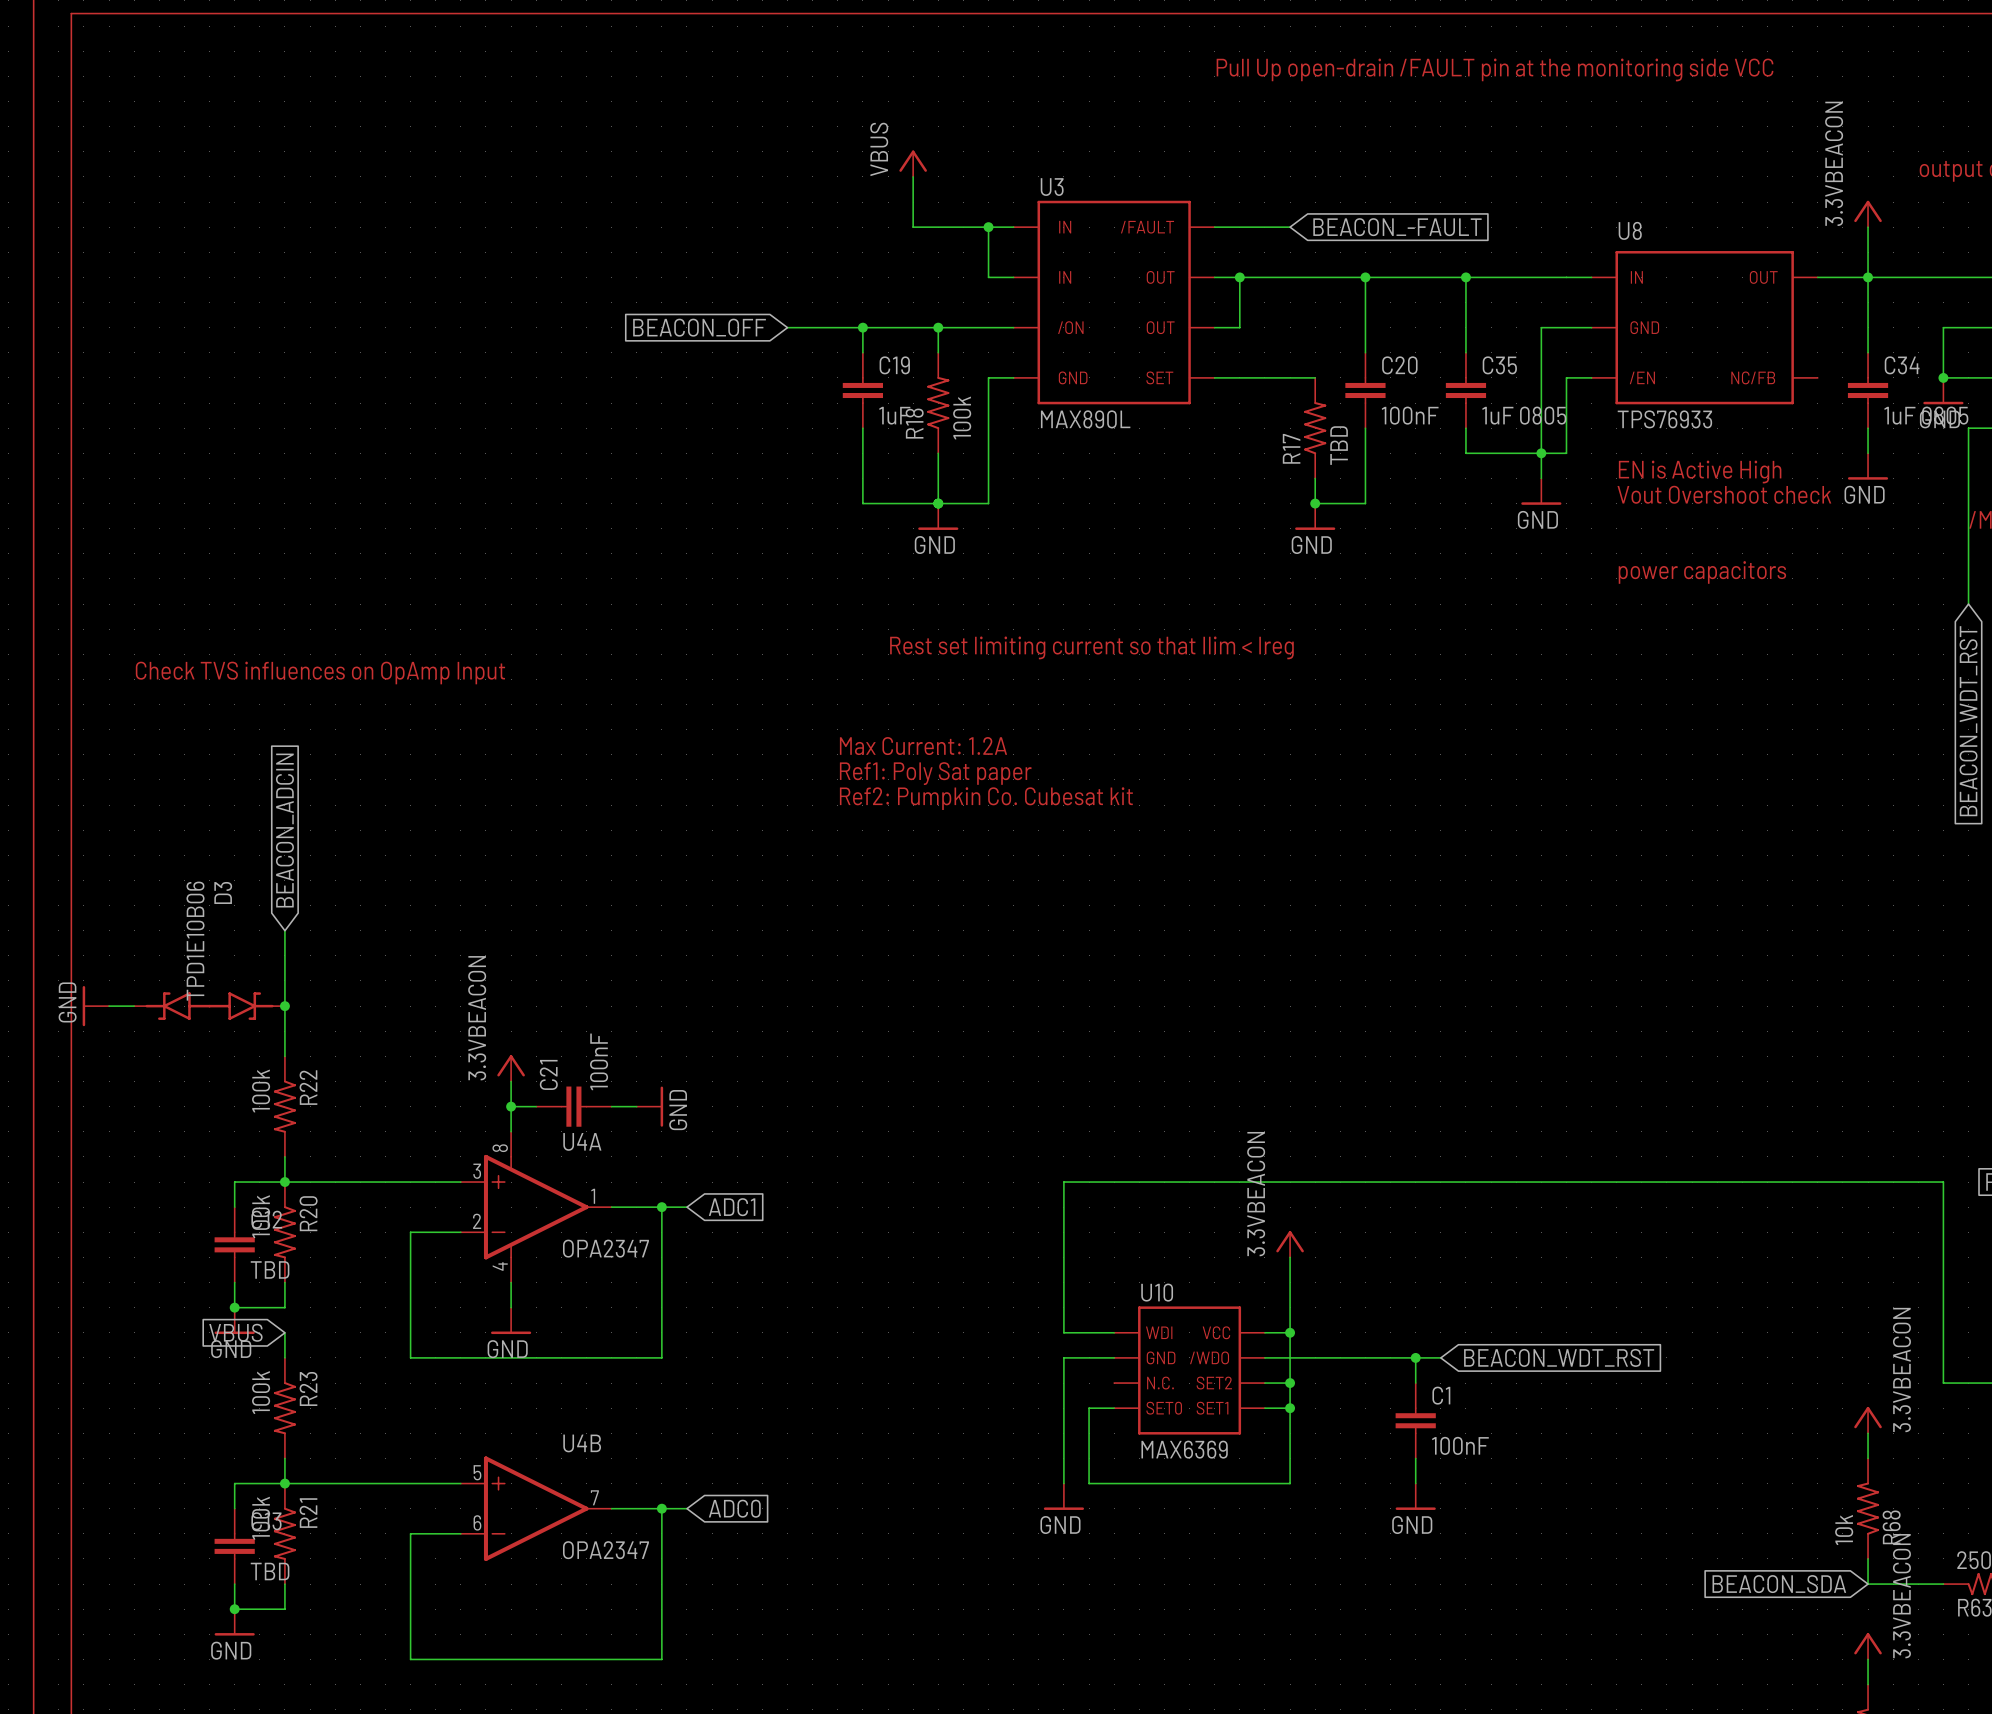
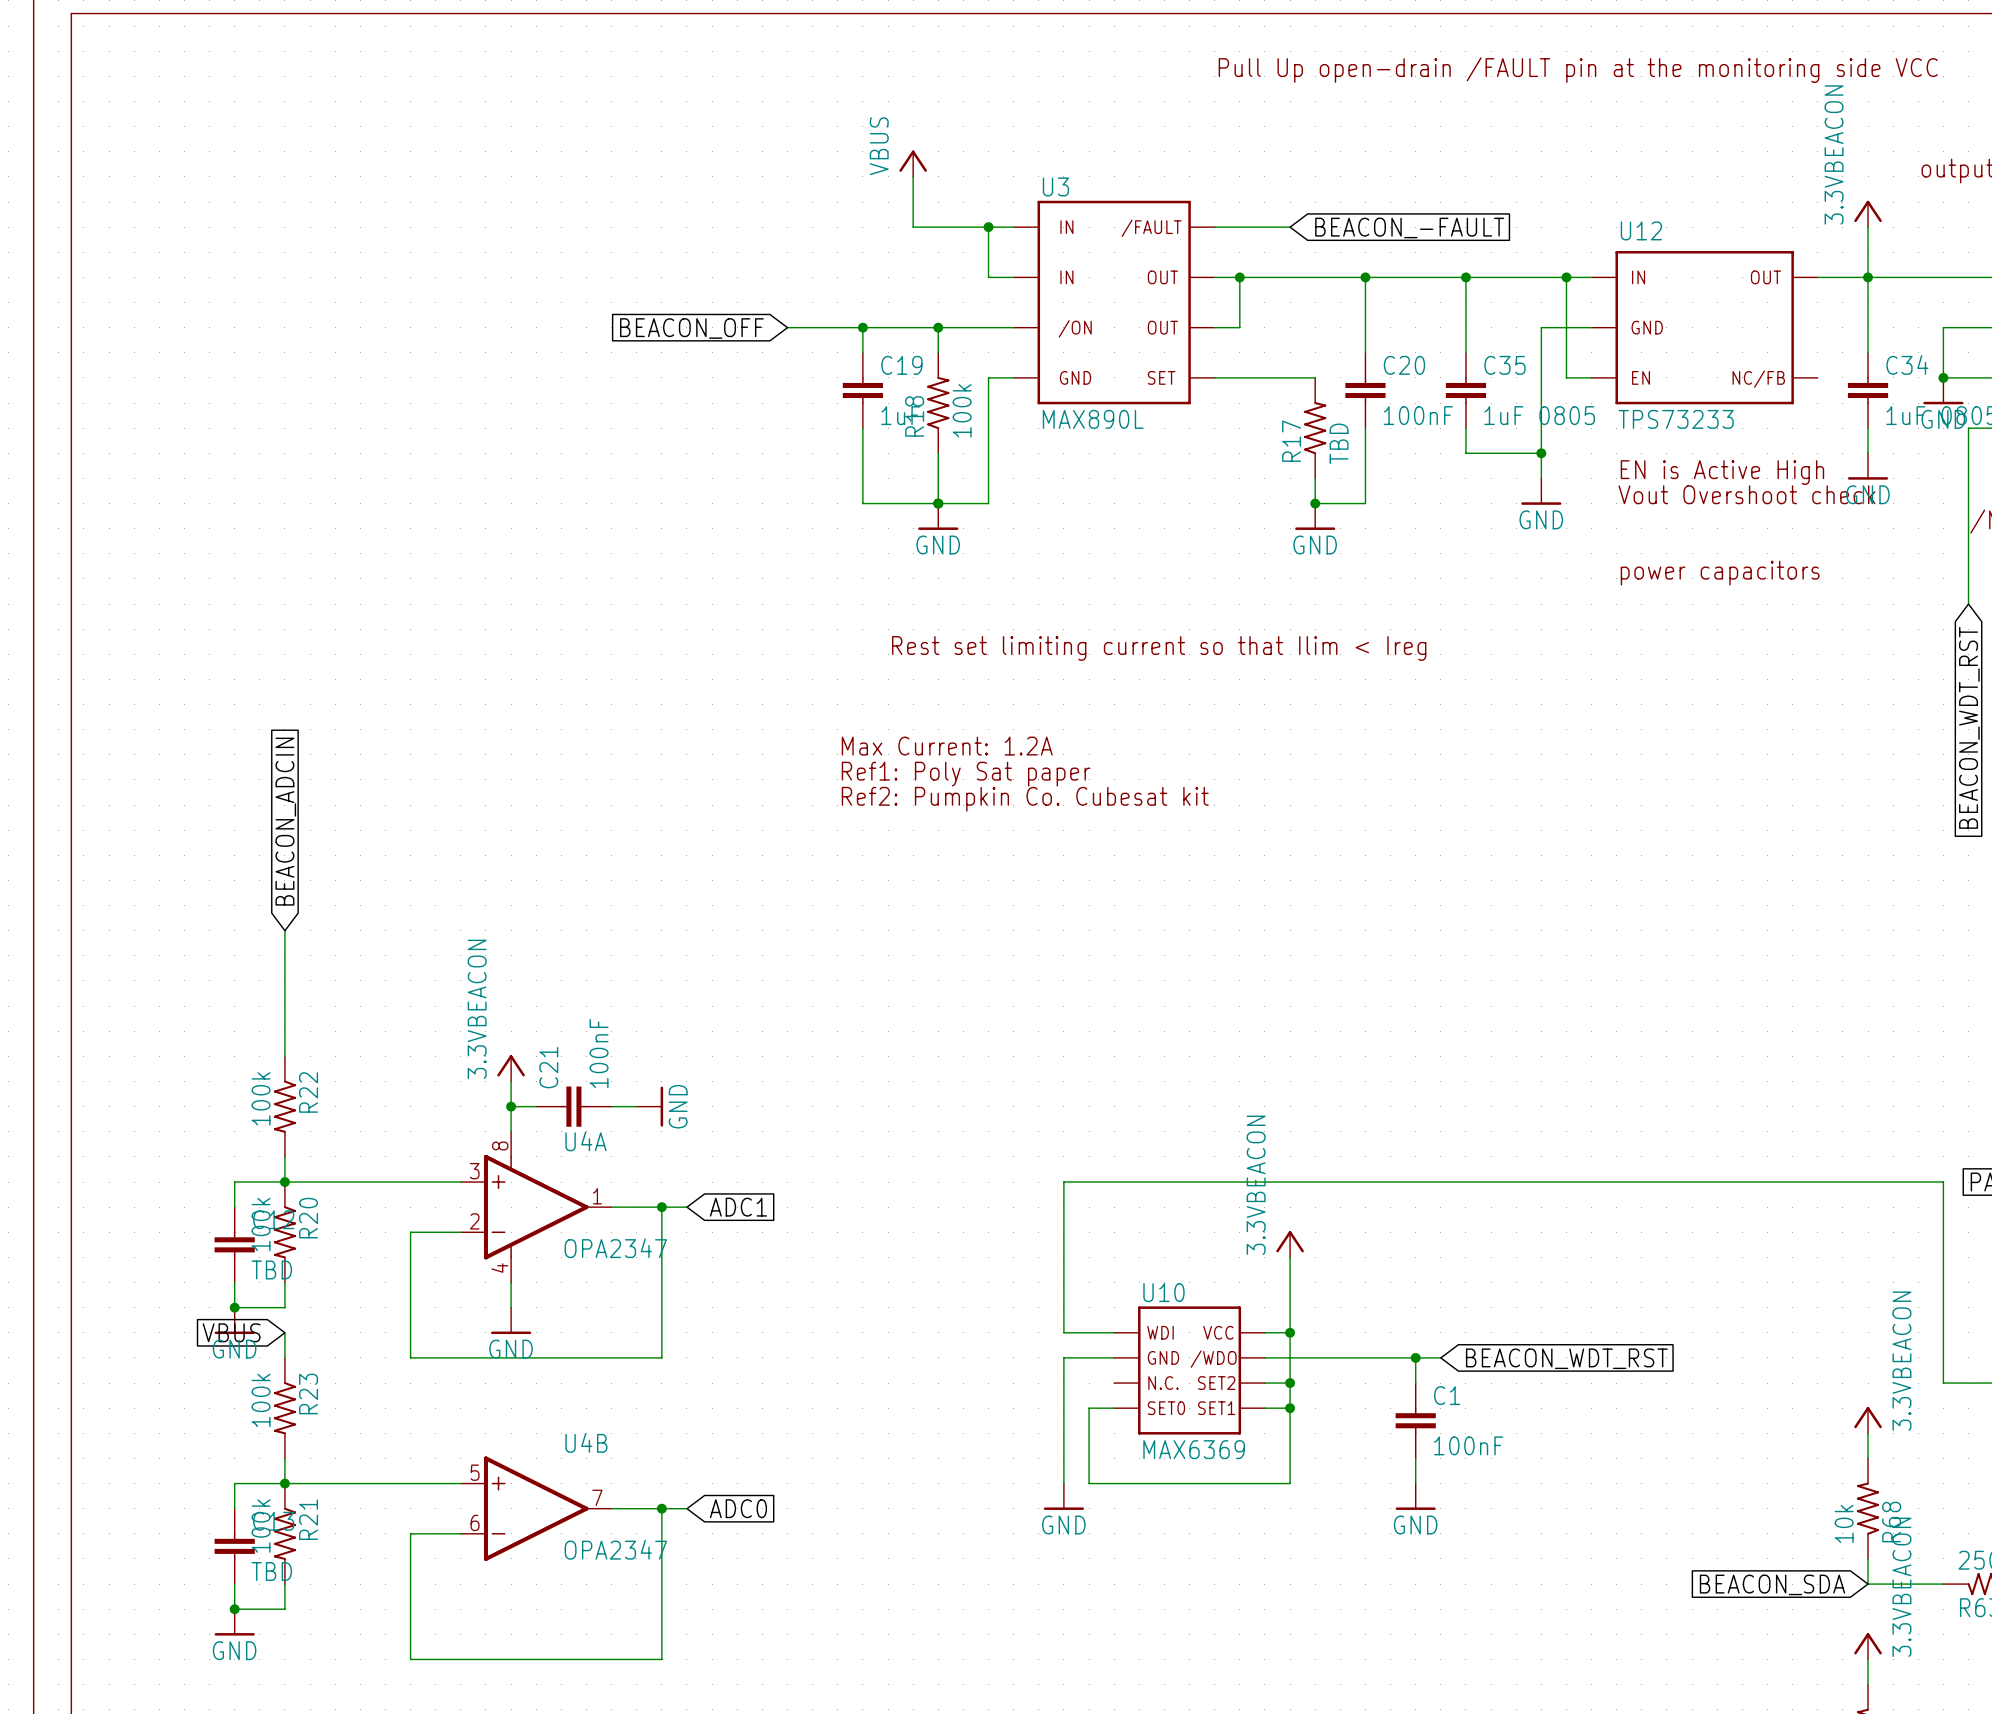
U8 name: U8 (1630, 230) -> U12 (1641, 230)
junction: none -> (1566, 277)
wire: (1566, 377) (1566, 453) (1541, 453) -> (1566, 377) (1566, 277)
U8 text: /EN (1642, 377) -> EN (1641, 377)
U8 value: TPS76933 (1664, 419) -> TPS73233 (1676, 419)
text: Check TVS influences on OpAmp Input (320, 672) -> none
power symbol: GND (95, 1006) -> none
wire: (109, 1006) (134, 1006) -> none
D3: TPD1E10B06 (209, 1006) -> none
junction: (284, 1006) -> none

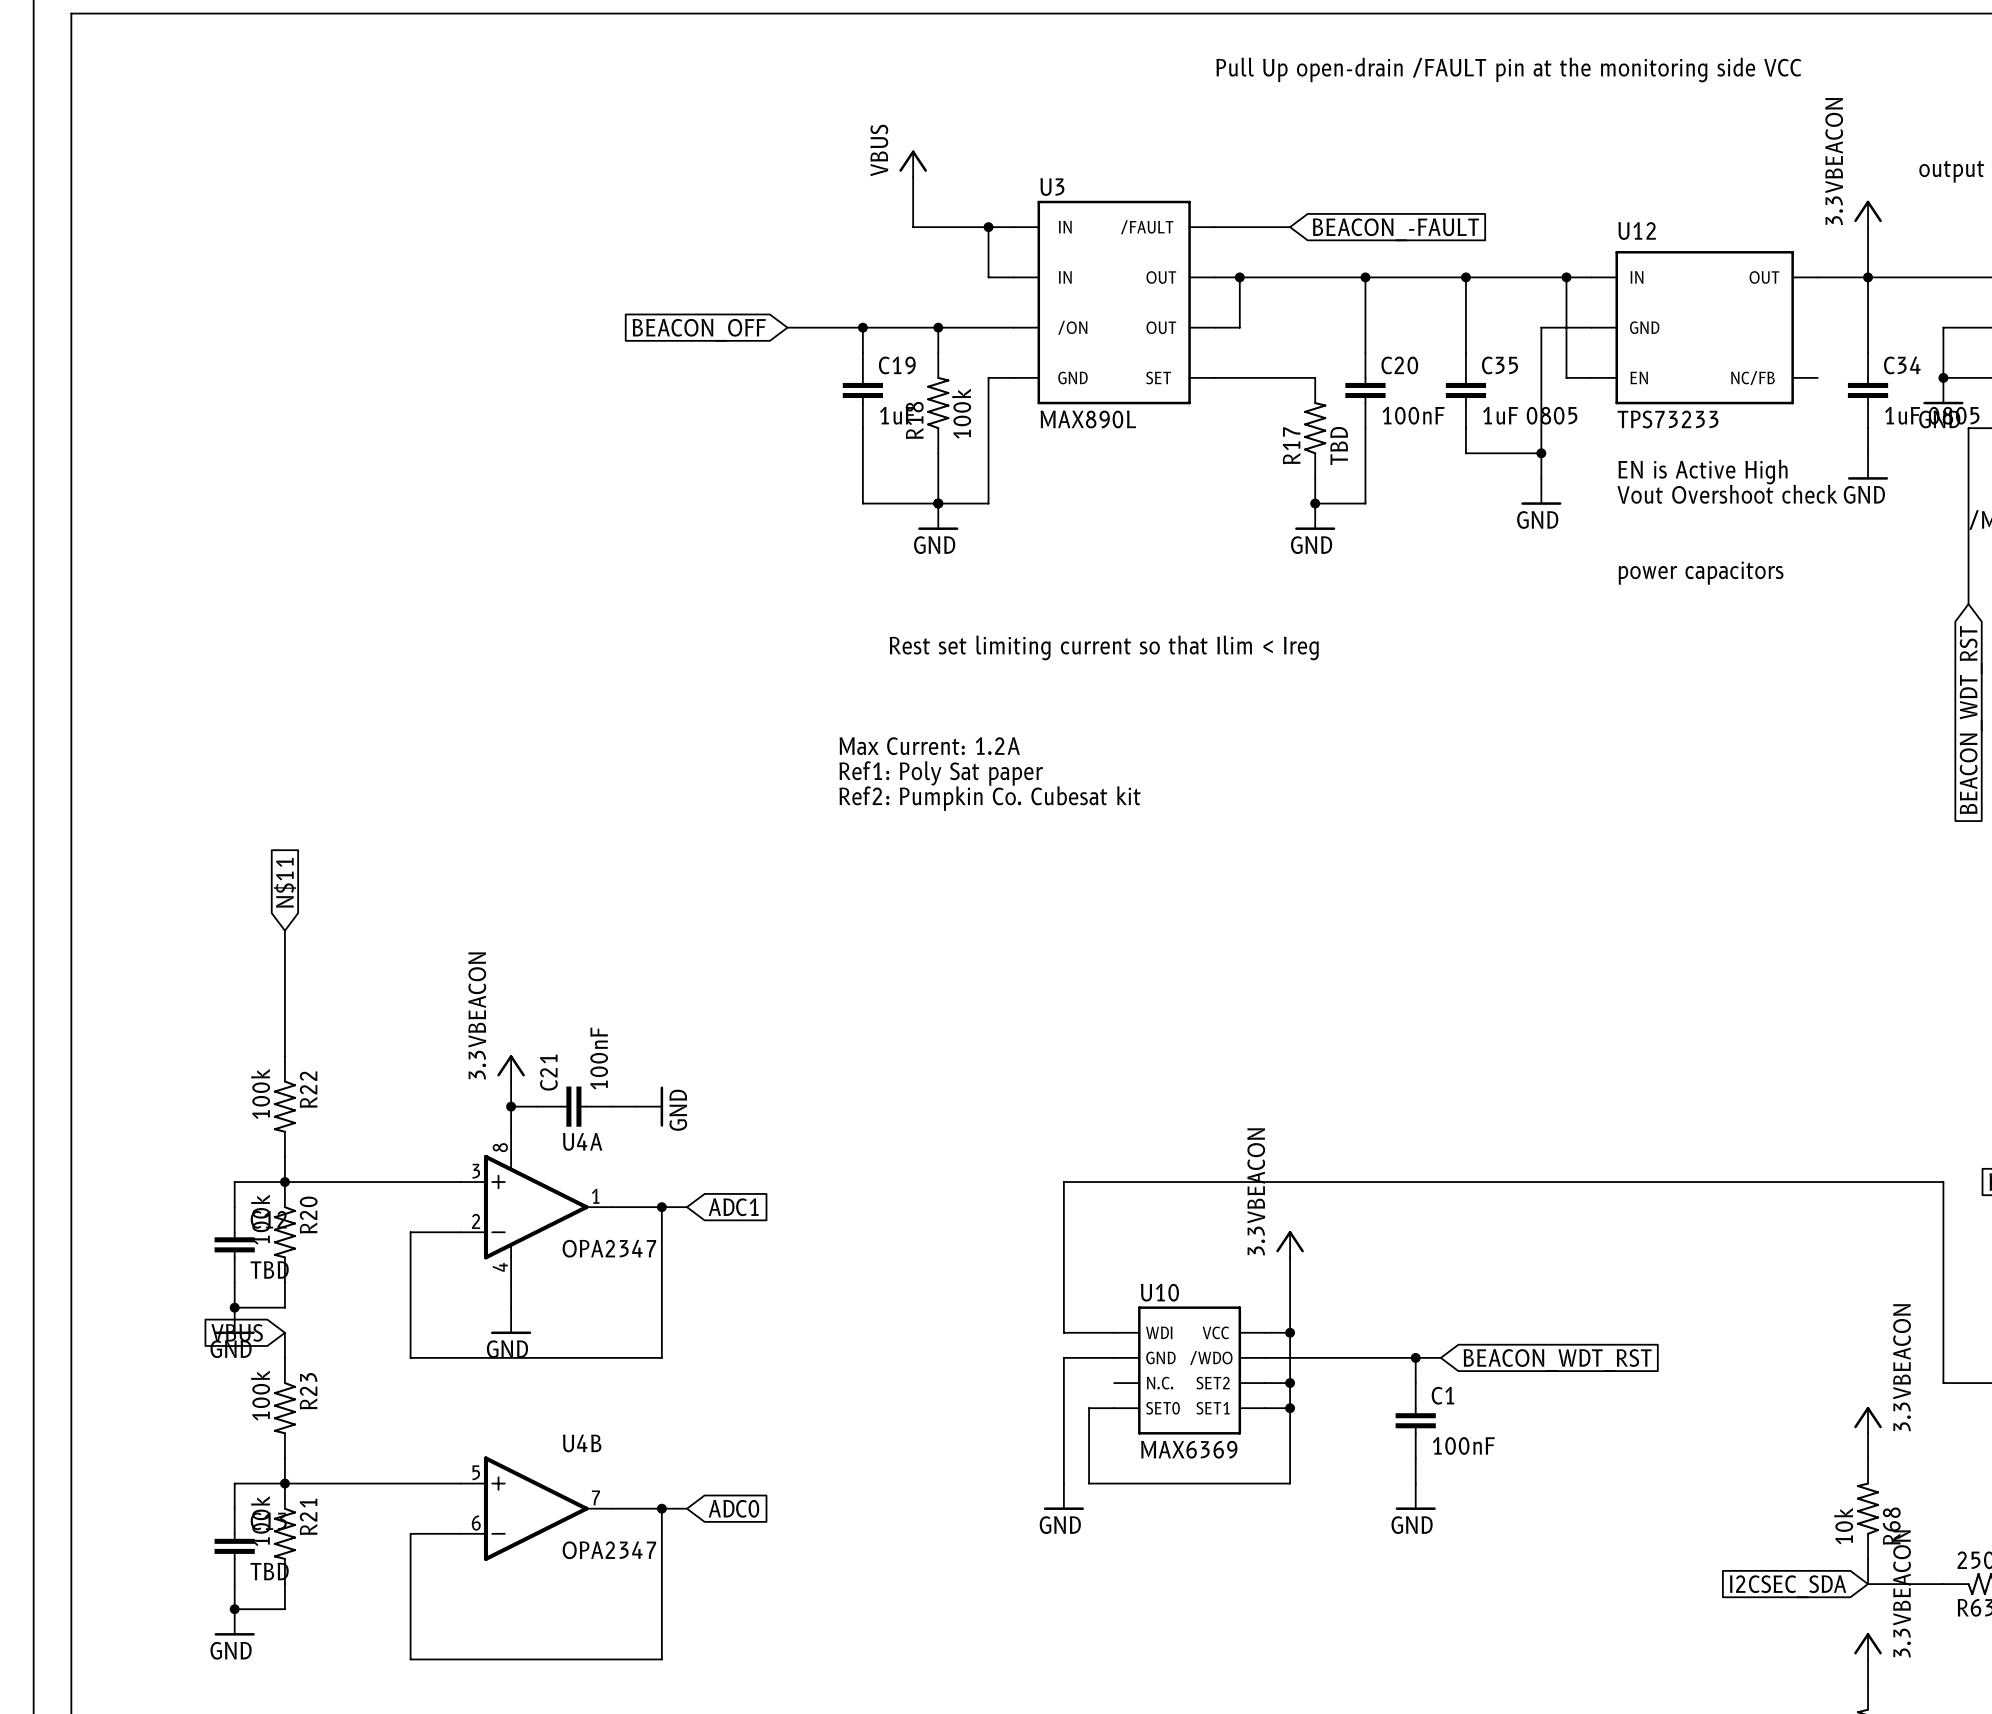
global label: BEACON_ADCIN (285, 821) -> N$11 (284, 882)
global label: BEACON_SDA (1772, 1584) -> I2CSEC_SDA (1788, 1586)

